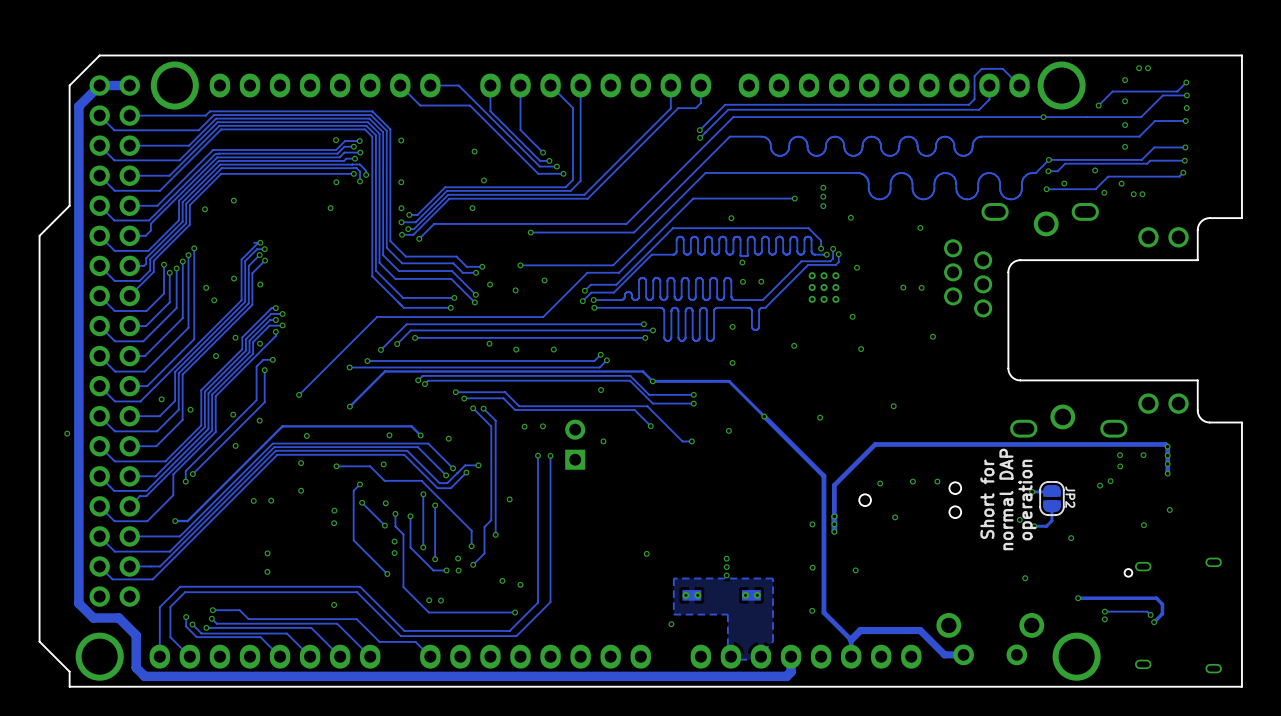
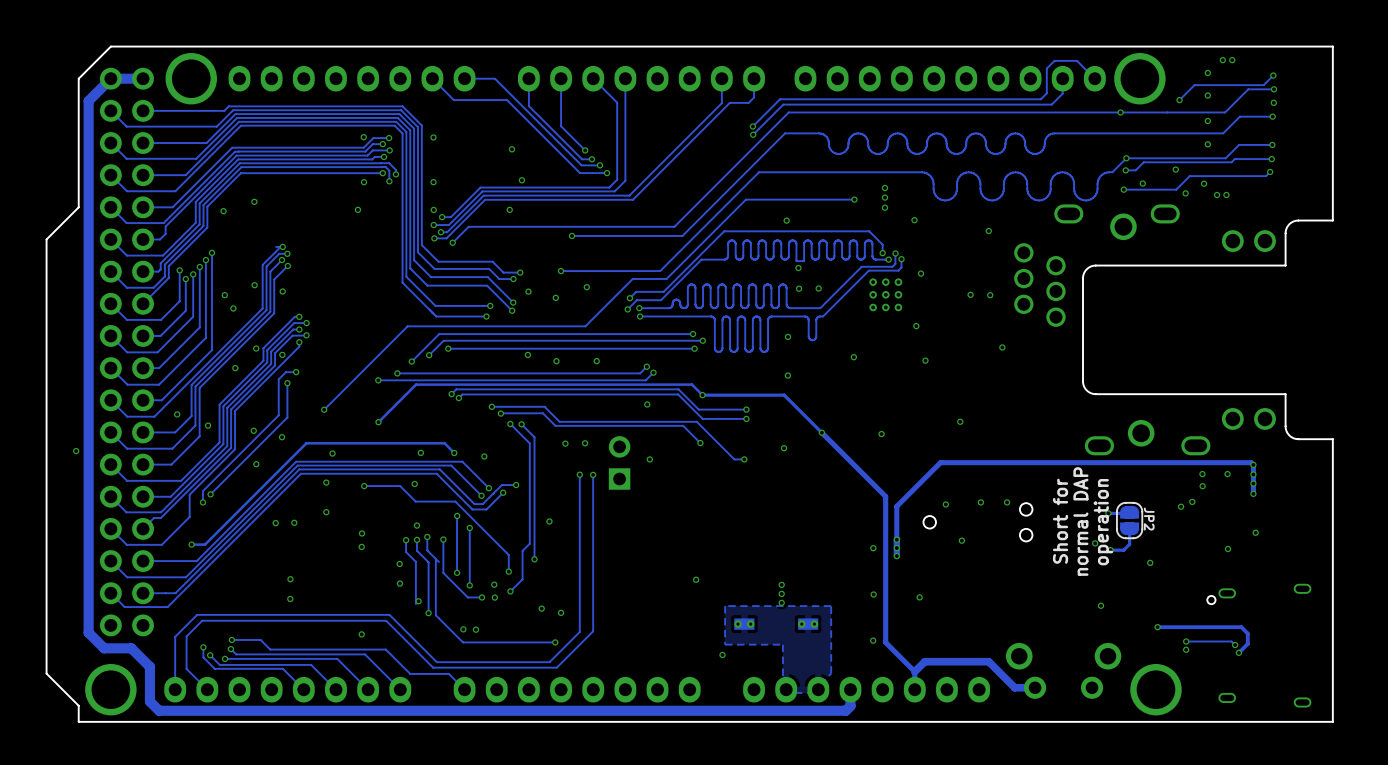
track: (359, 484) (353, 490) (353, 540) (387, 574) -> none
via: (359, 484) -> none
track: (362, 502) (384, 525) -> none
via: (362, 502) -> none
track: none -> (406, 540) (406, 552) (415, 561) (415, 603)
via: none -> (406, 540)
track: none -> (417, 539) (417, 550) (428, 562) (428, 613)
via: none -> (417, 539)
via: (384, 525) -> none
via: none -> (399, 563)
via: (394, 541) -> none
via: (394, 553) -> none
via: none -> (399, 583)
via: none -> (428, 613)

